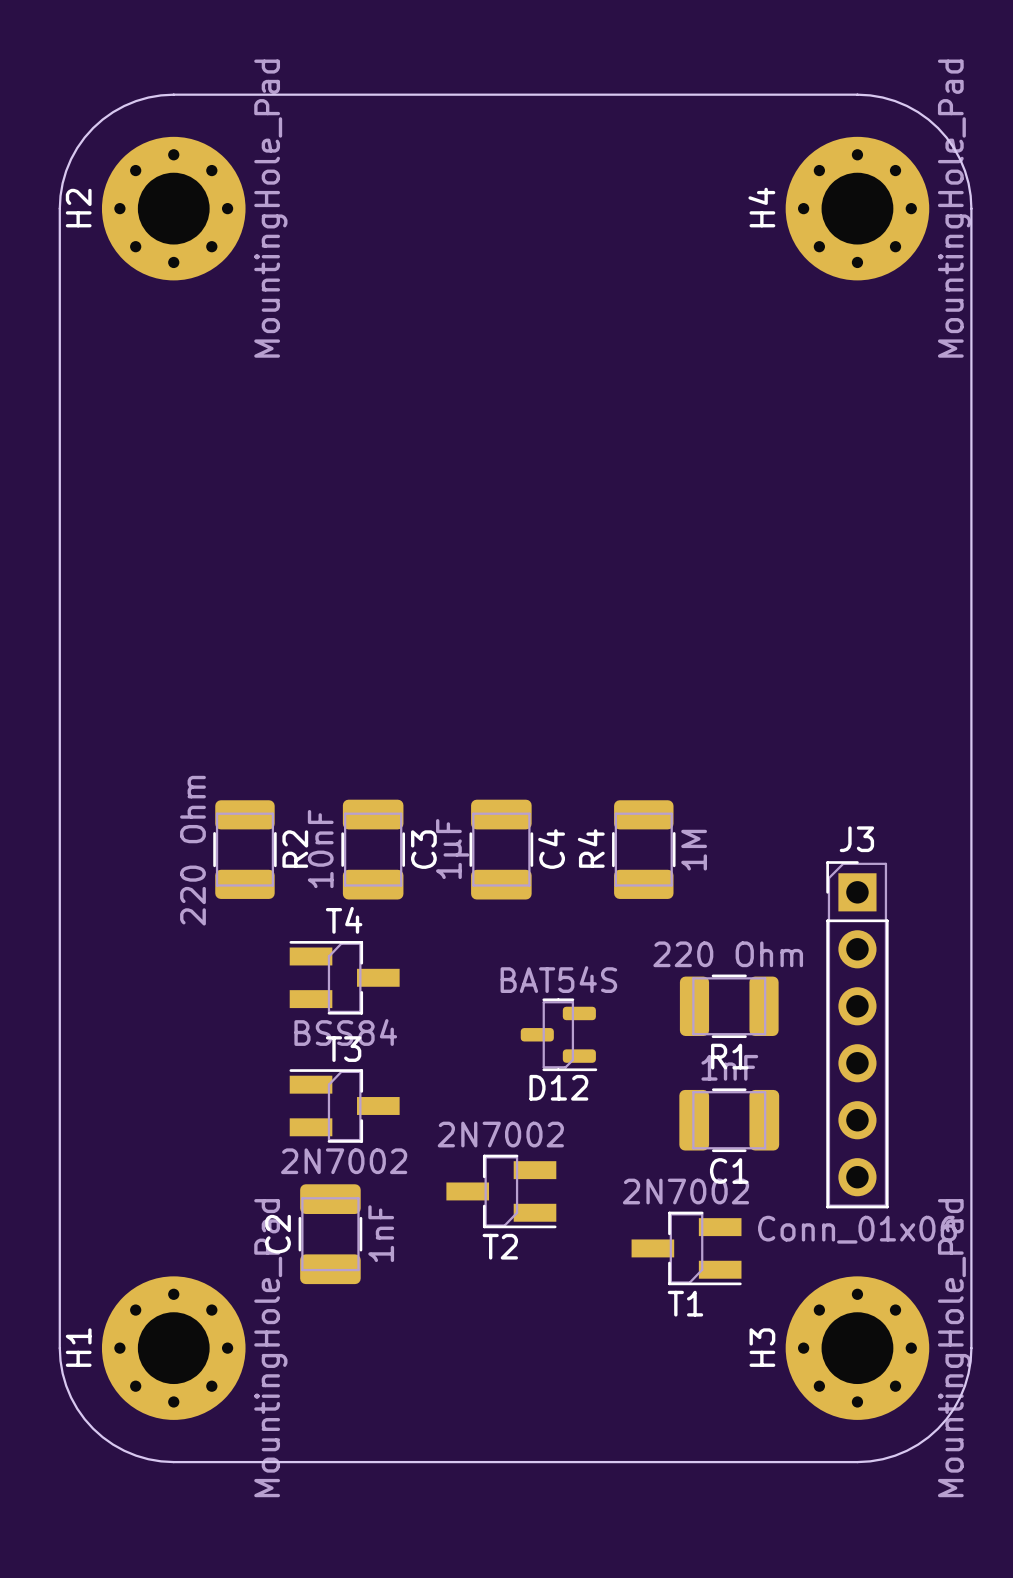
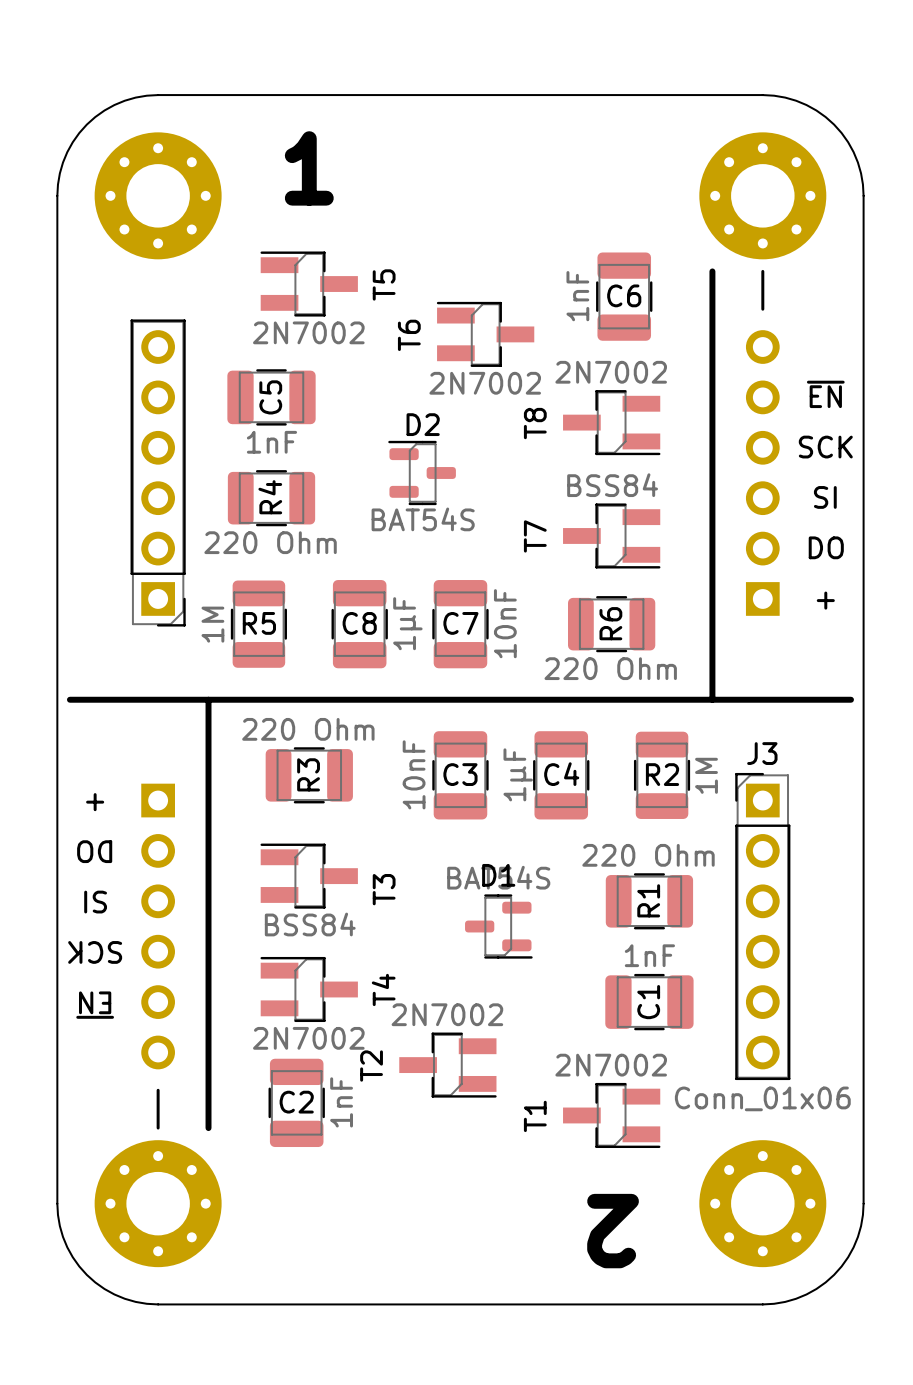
text: none -> 1 (309, 168)
H4 name: H4 (761, 207) -> none
H2 name: H2 (78, 208) -> none
H2 value: MountingHole_Pad (270, 208) -> none
H4 value: MountingHole_Pad (954, 208) -> none
line: none -> (712, 271) (712, 699)
line: none -> (762, 271) (762, 309)
T5: none -> 2N7002 (309, 284)
C6: none -> 1nF (624, 296)
T6: none -> 2N7002 (485, 334)
text: none -> ~{EN} (825, 394)
C5: none -> 1nF (271, 397)
T8: none -> 2N7002 (611, 422)
text: none -> SCK (825, 447)
part: none -> (158, 472)
D2: none -> BAT54S (422, 472)
part: none -> (762, 472)
text: none -> SI (825, 497)
T7: none -> BSS84 (611, 535)
text: none -> DO (826, 547)
text: none -> + (825, 600)
R5: none -> 1M (258, 624)
C8: none -> 1µF (359, 624)
C7: none -> 10nF (460, 624)
R6: none -> 220 Ohm (611, 624)
line: none -> (69, 699) (850, 699)
line: none -> (208, 699) (208, 1128)
R4 name position: R4 (591, 848) -> R4 (270, 497)
R2 position: (244, 849) -> (662, 775)
R2 name rotation: 0° (295, 849) -> 90° clockwise (662, 774)
C3 position: (373, 849) -> (460, 775)
C3 name rotation: 0° (423, 849) -> 90° clockwise (460, 774)
C4 position: (501, 849) -> (561, 775)
C4 name rotation: 0° (551, 849) -> 90° clockwise (561, 774)
R4 rotation: 0° (643, 849) -> 90° clockwise (271, 498)
R4 position: (643, 849) -> (271, 498)
R2 value: 220 Ohm (192, 850) -> 1M (706, 775)
R4 value: 1M (694, 850) -> 220 Ohm (270, 542)
R3: none -> 220 Ohm (309, 775)
text: none -> + (95, 802)
T4 name: T4 (344, 920) -> T3 (384, 889)
text: none -> DO (94, 851)
text: none -> SI (95, 902)
part: none -> (158, 926)
T3 name: T3 (343, 1049) -> T4 (383, 989)
R1 name rotation: 0° (729, 1056) -> 90° counterclockwise (648, 900)
text: none -> SCK (95, 952)
D12 name: D12 (558, 1087) -> D1 (498, 875)
text: none -> ~{EN} (95, 1005)
C1 name rotation: 0° (729, 1170) -> 90° counterclockwise (648, 1002)
line: none -> (158, 1090) (158, 1128)
C2 name rotation: 0° (278, 1234) -> 90° clockwise (296, 1102)
T2 name rotation: 0° (500, 1246) -> 90° counterclockwise (371, 1066)
T2 name position: T2 (500, 1246) -> T2 (371, 1066)
T1 name rotation: 0° (685, 1303) -> 90° counterclockwise (535, 1116)
T1 name position: T1 (685, 1303) -> T1 (535, 1116)
H1 name: H1 (78, 1347) -> none
H3 name: H3 (762, 1347) -> none
H1 value: MountingHole_Pad (270, 1348) -> none
H3 value: MountingHole_Pad (954, 1348) -> none
text: none -> 2 (613, 1231)

